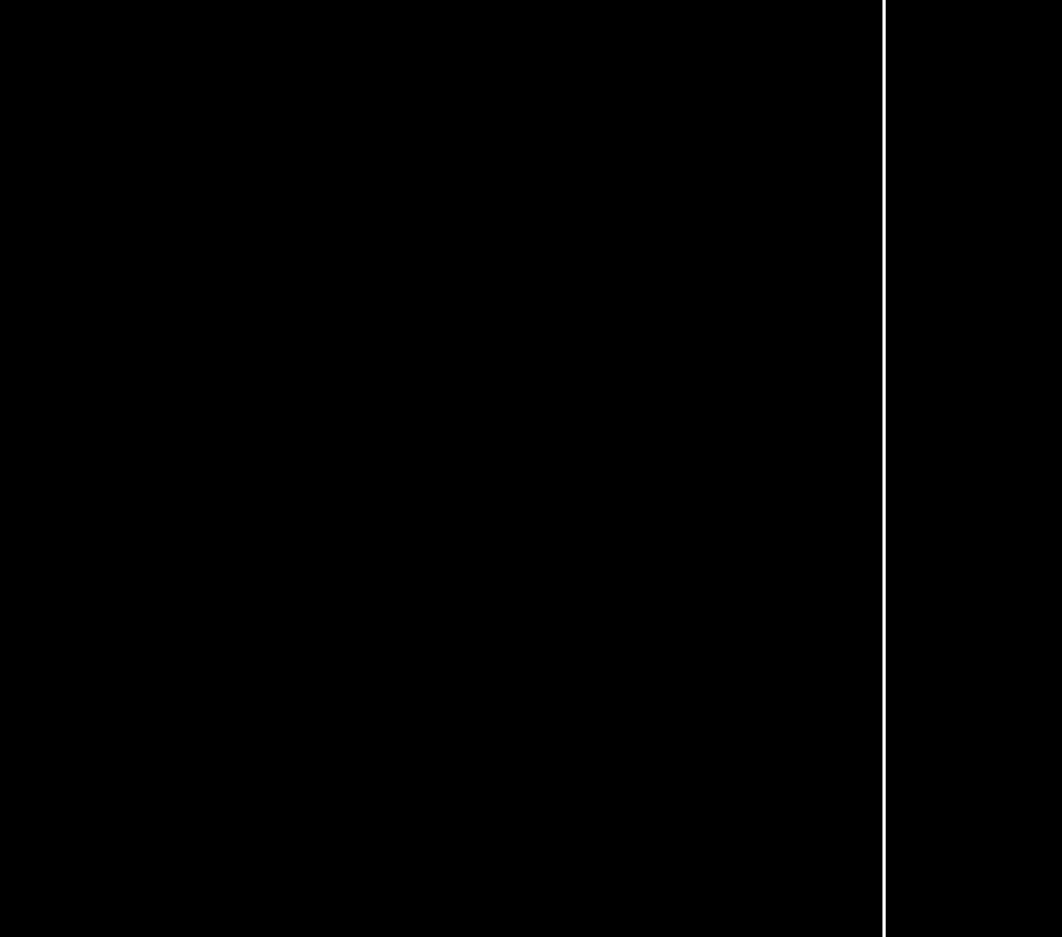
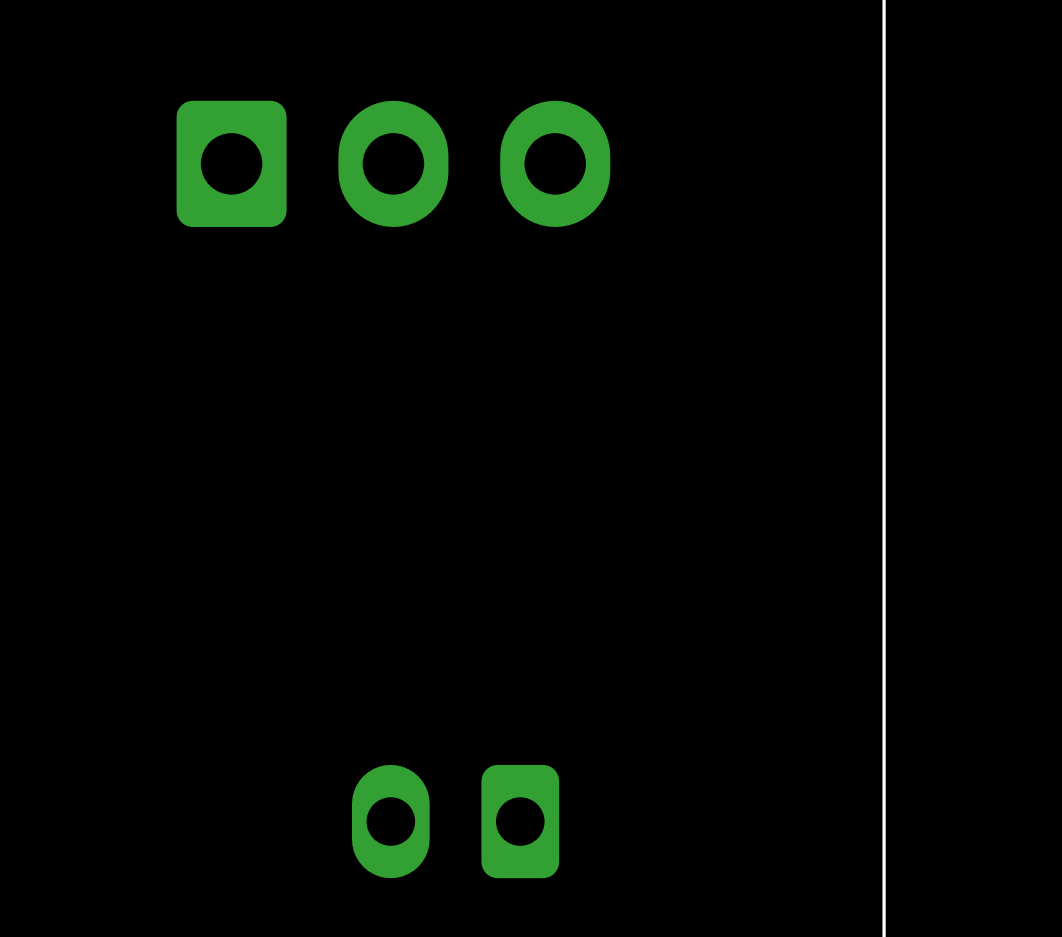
part: none -> (393, 163)
part: none -> (455, 821)

